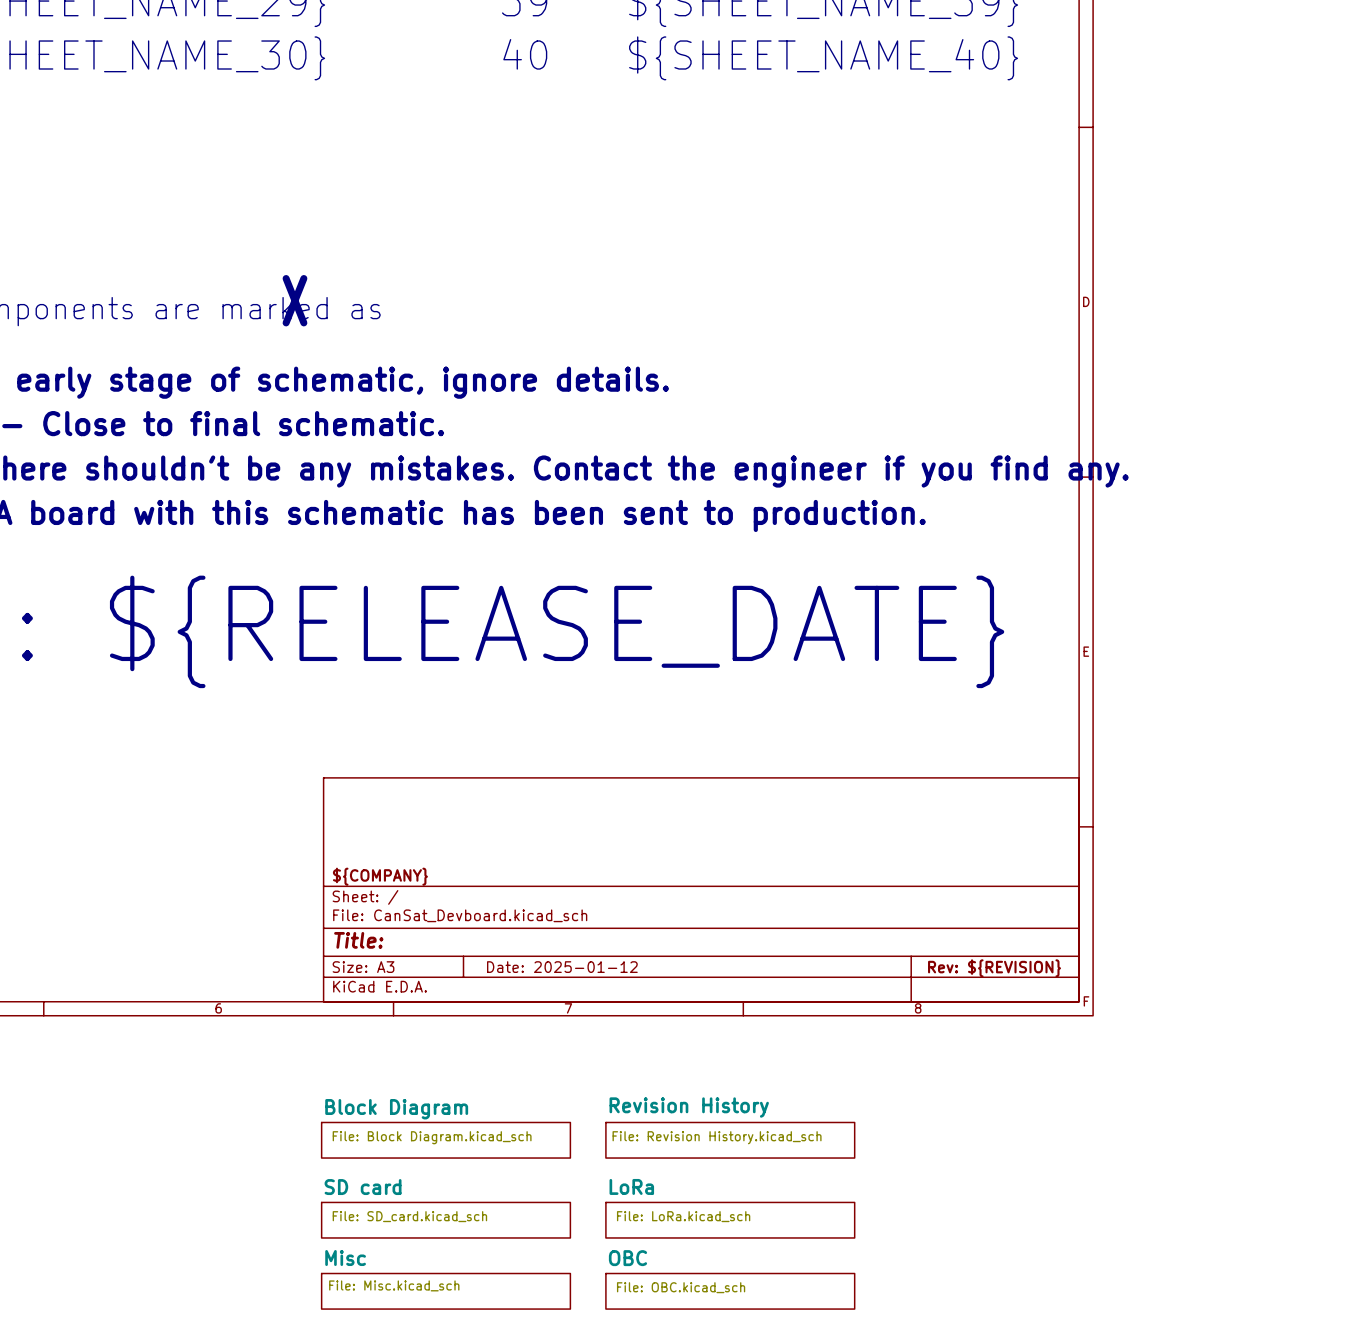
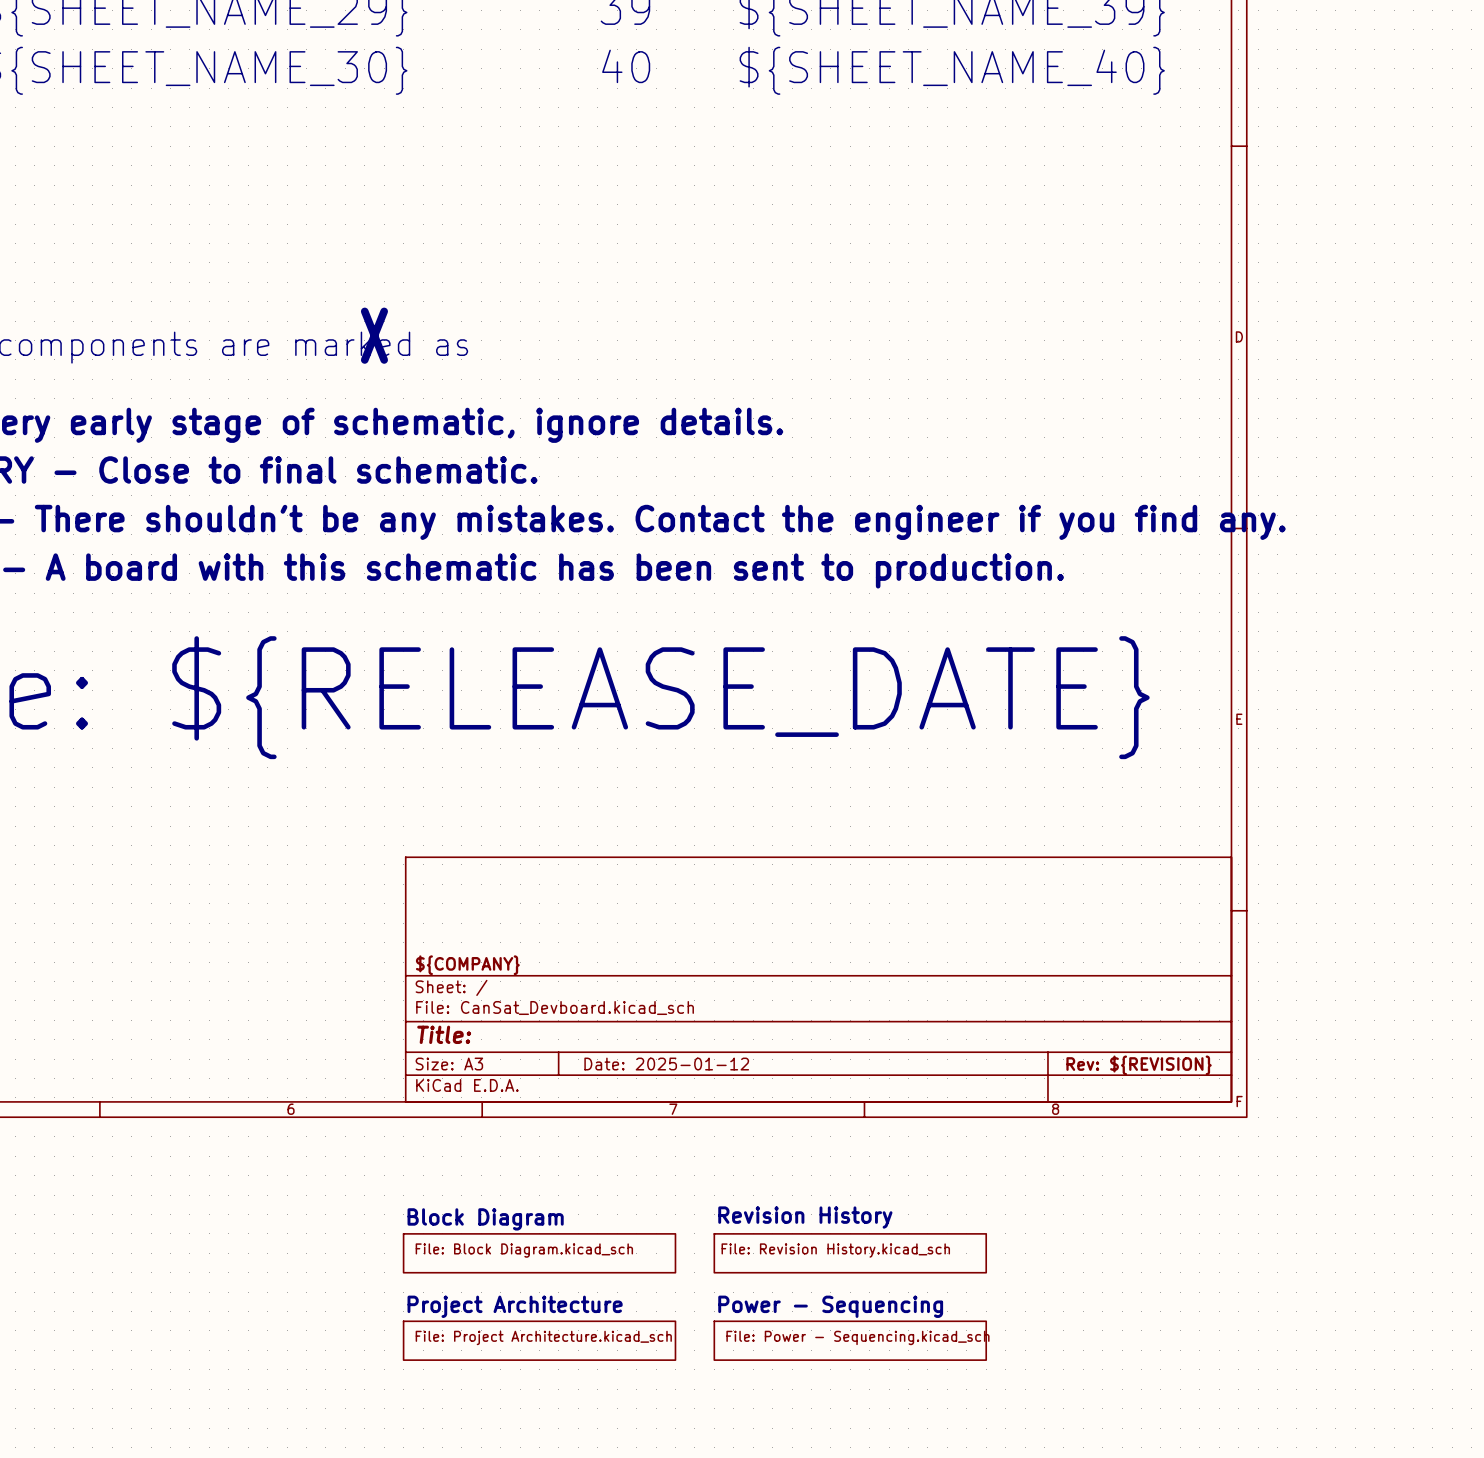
sheet LoRa name: LoRa (631, 1186) -> Power - Sequencing (830, 1306)
sheet SD card name: SD card (363, 1187) -> Project Architecture (515, 1306)
sheet SD card value: File: SD_card.kicad_sch (409, 1216) -> File: Project Architecture.kicad_sch (543, 1337)
sheet LoRa value: File: LoRa.kicad_sch (683, 1216) -> File: Power - Sequencing.kicad_sch (857, 1337)
sheet Misc: File: Misc.kicad_sch (446, 1291) -> none
sheet OBC: File: OBC.kicad_sch (730, 1291) -> none

